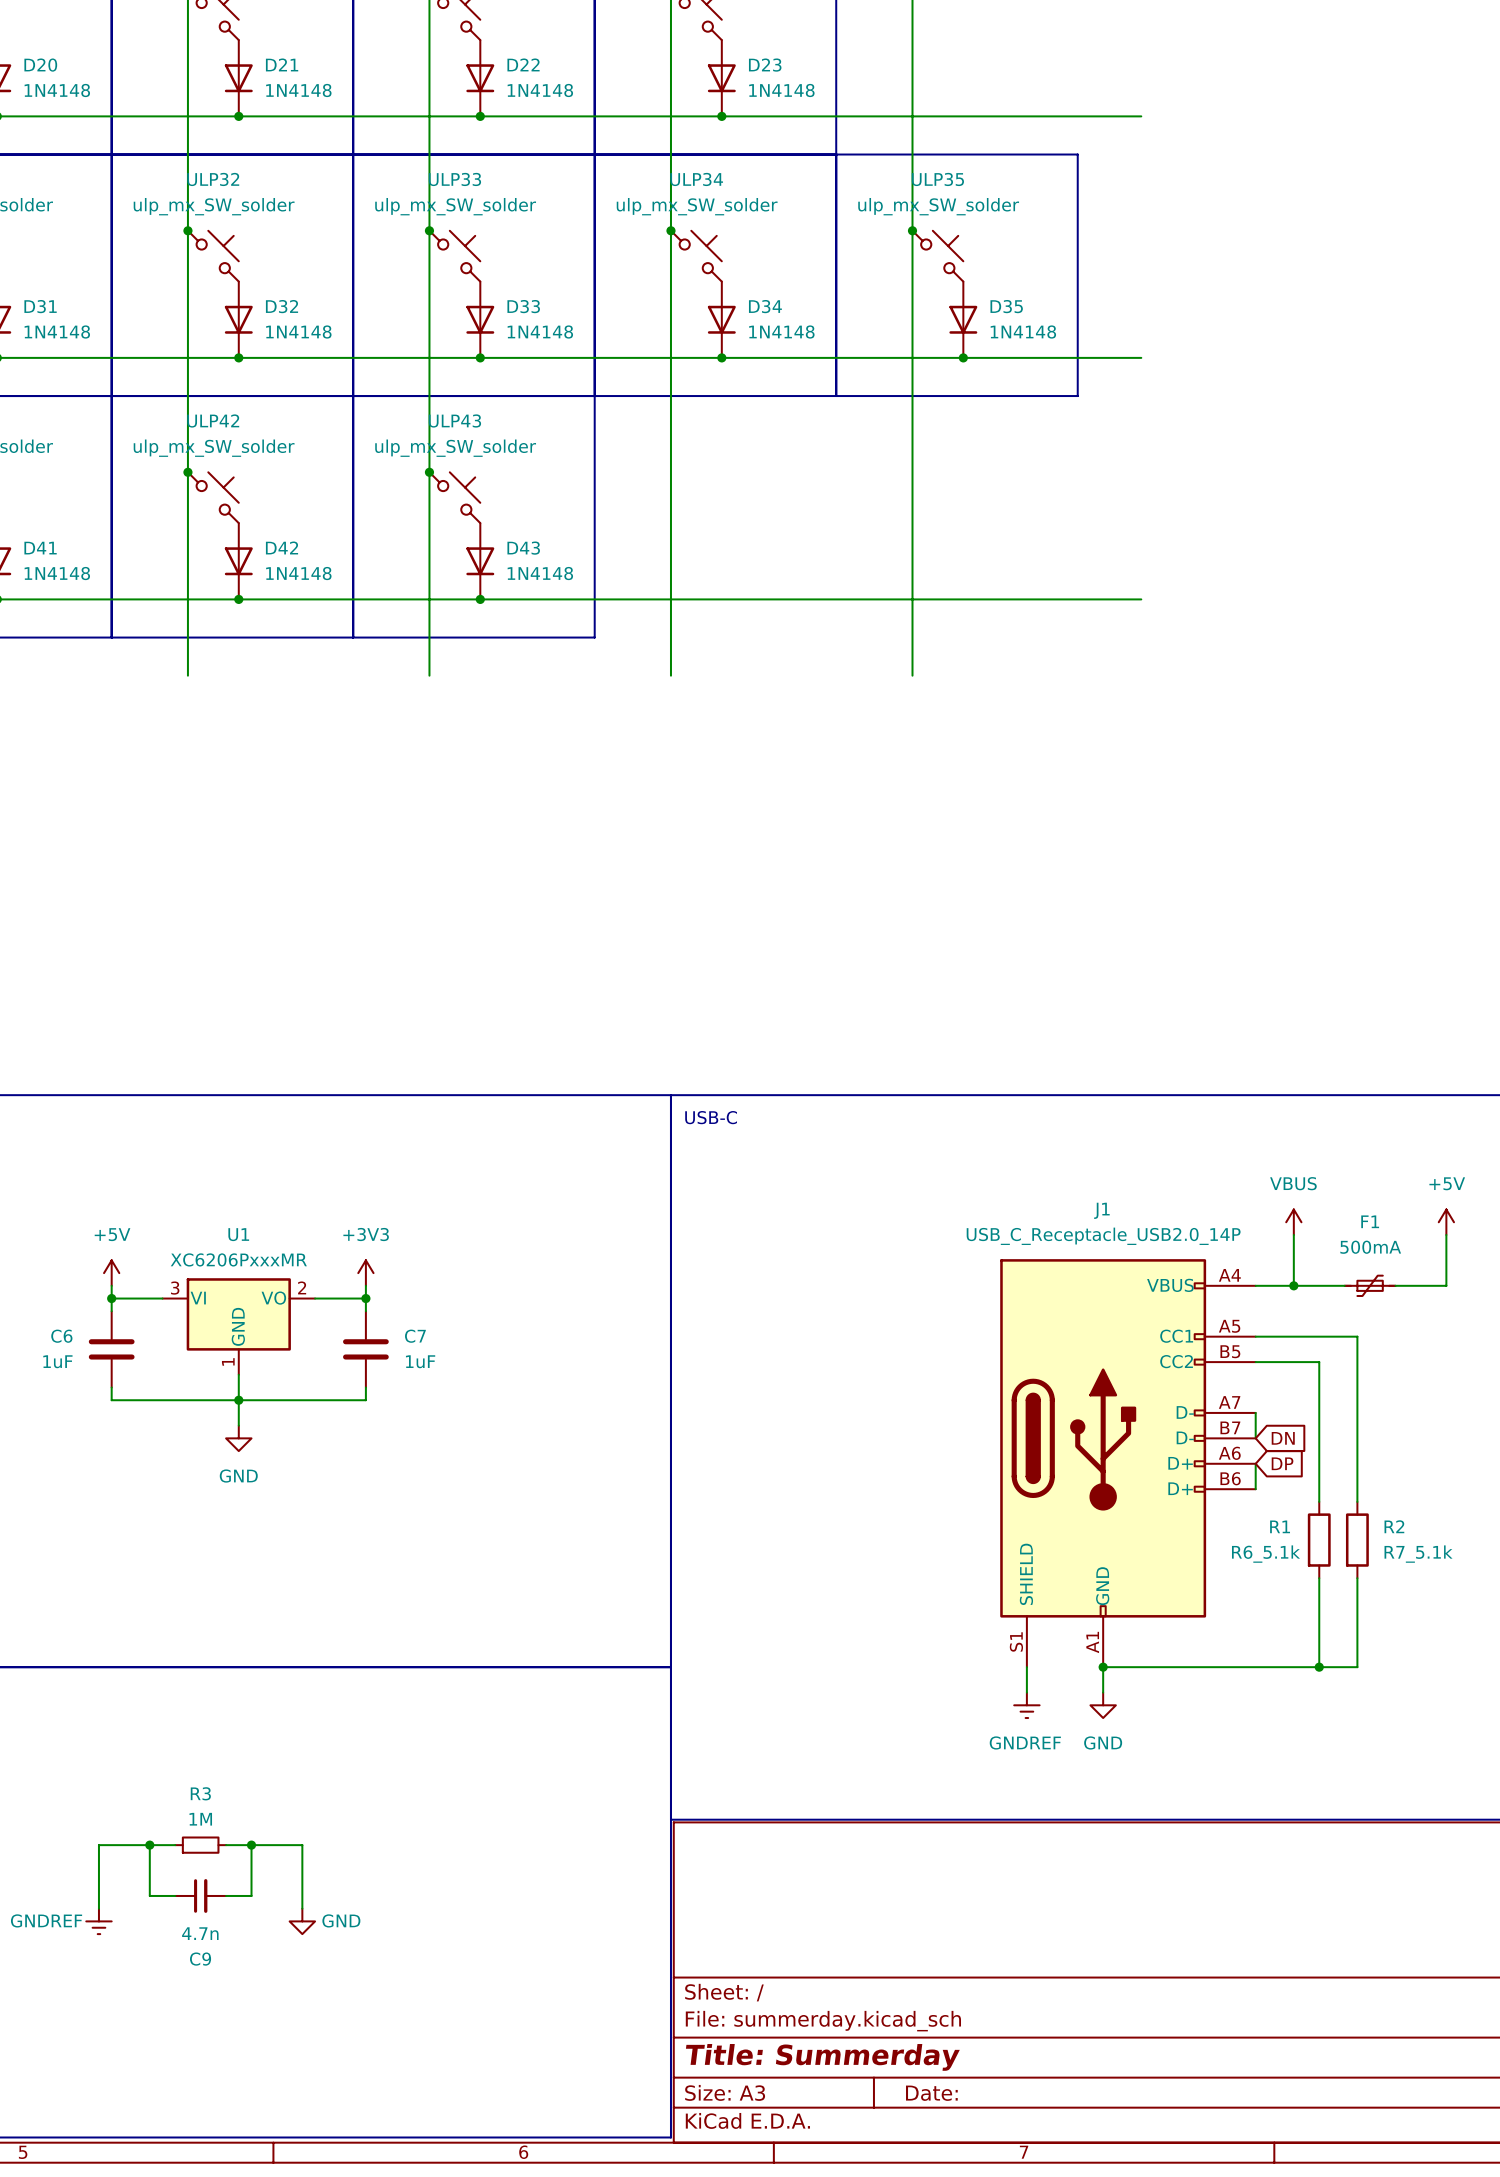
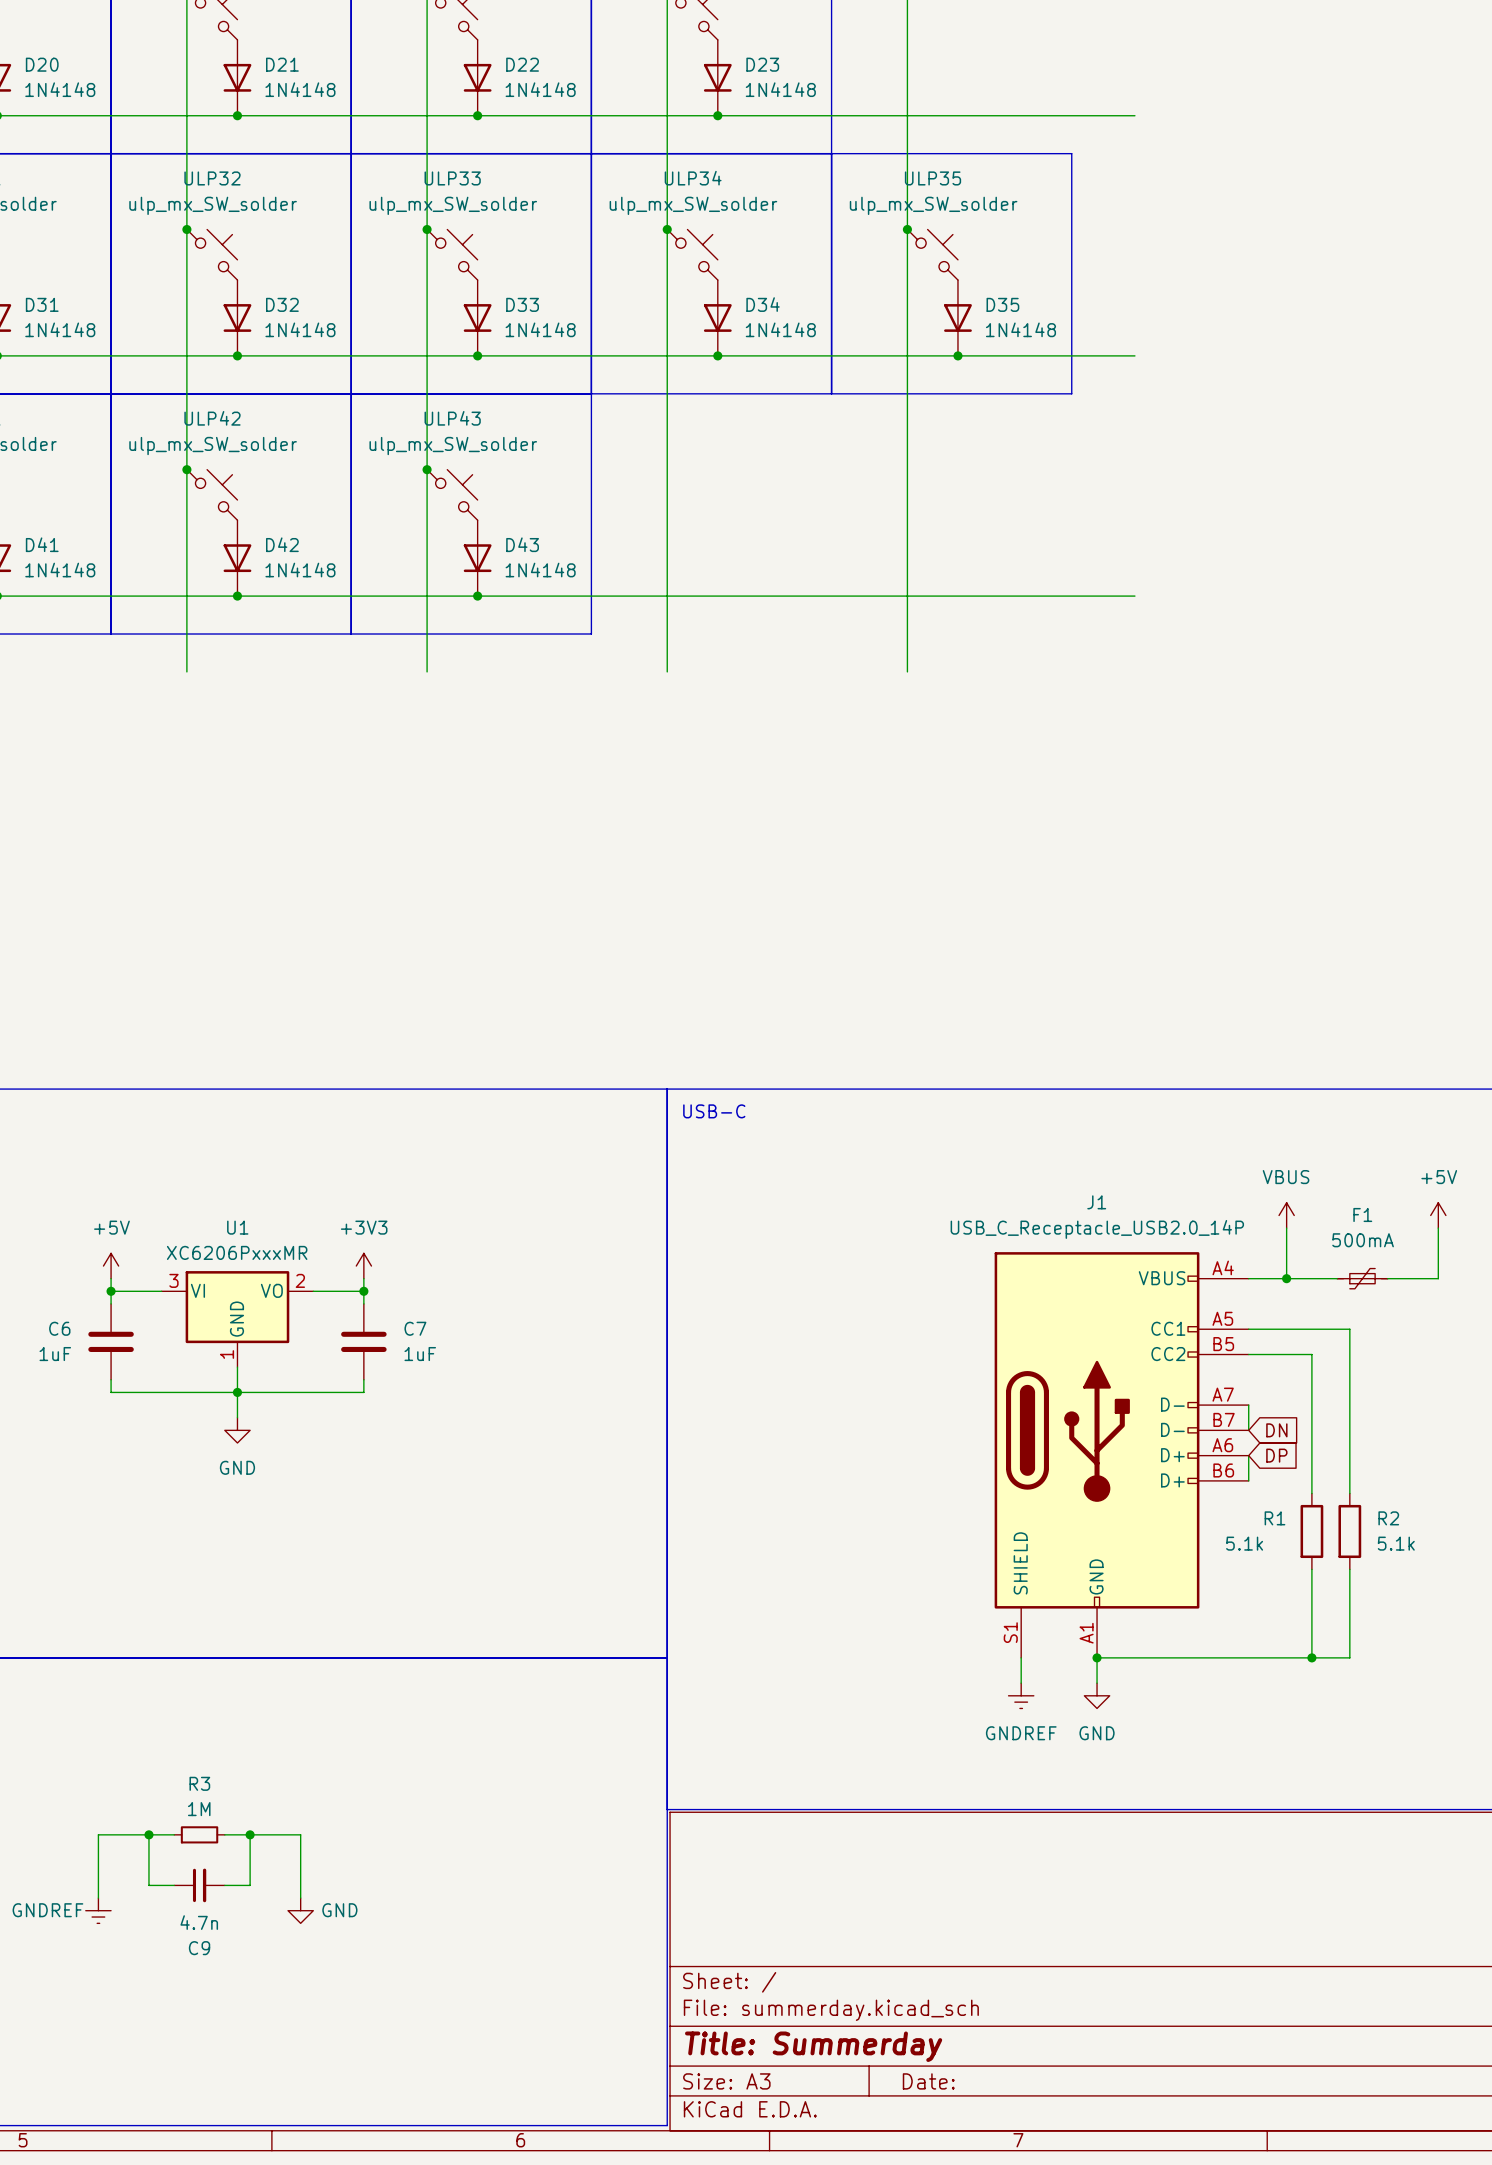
R1 value: R6_5.1k (1265, 1554) -> 5.1k (1244, 1543)
R2 value: R7_5.1k (1418, 1554) -> 5.1k (1396, 1543)

